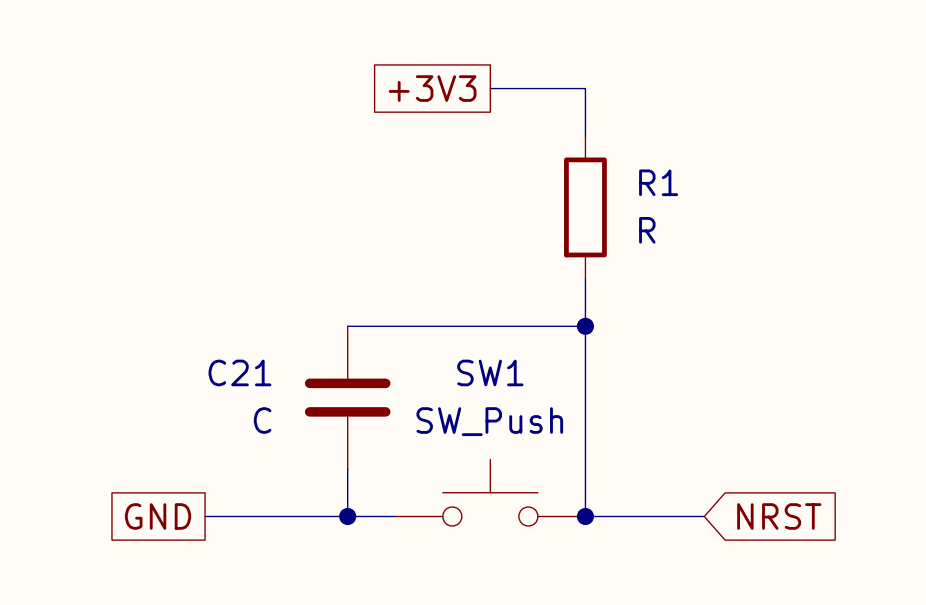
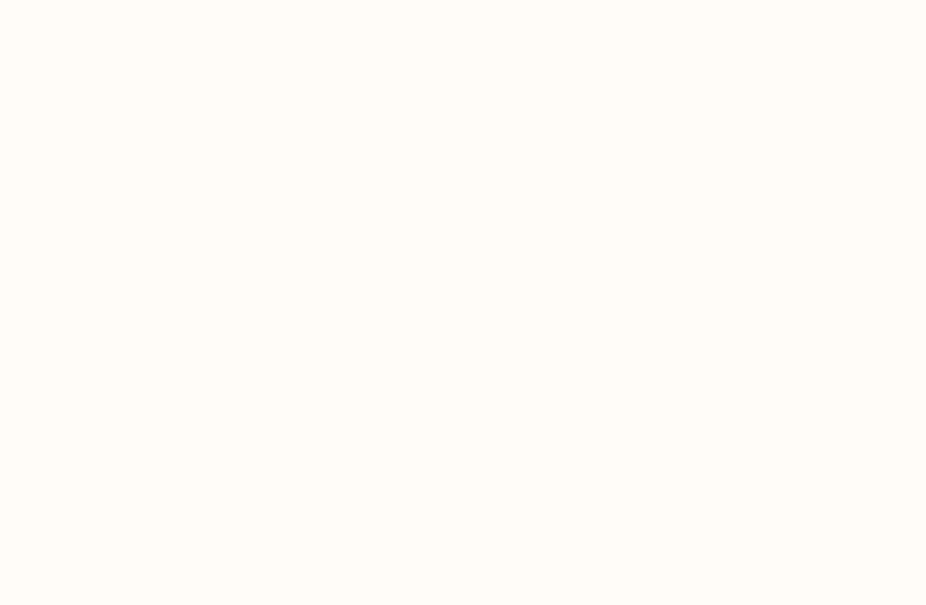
global label: +3V3 (432, 88) -> none
wire: (490, 88) (585, 88) (585, 136) -> none
R1: R (585, 207) -> none
wire: (585, 278) (585, 516) (704, 516) -> none
wire: (347, 326) (585, 326) -> none
junction: (585, 326) -> none
C21: C (347, 397) -> none
wire: (347, 468) (347, 516) -> none
SW1: SW_Push (490, 492) -> none
global label: GND (158, 516) -> none
wire: (205, 516) (395, 516) -> none
junction: (347, 516) -> none
junction: (585, 516) -> none
global label: NRST (779, 516) -> none

